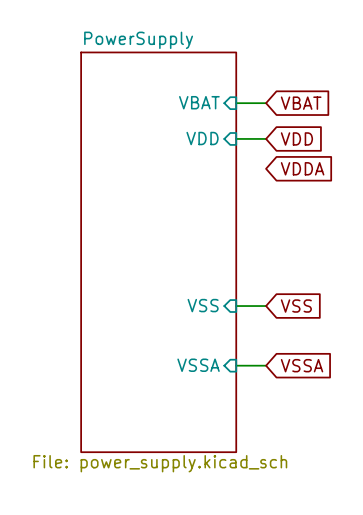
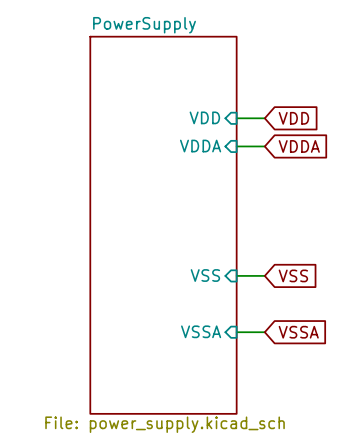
sheet pin: VBAT (199, 102) -> none
wire: (236, 103) (266, 103) -> (236, 146) (264, 146)
global label: VBAT (301, 103) -> none
sheet pin: none -> VDDA (200, 146)

